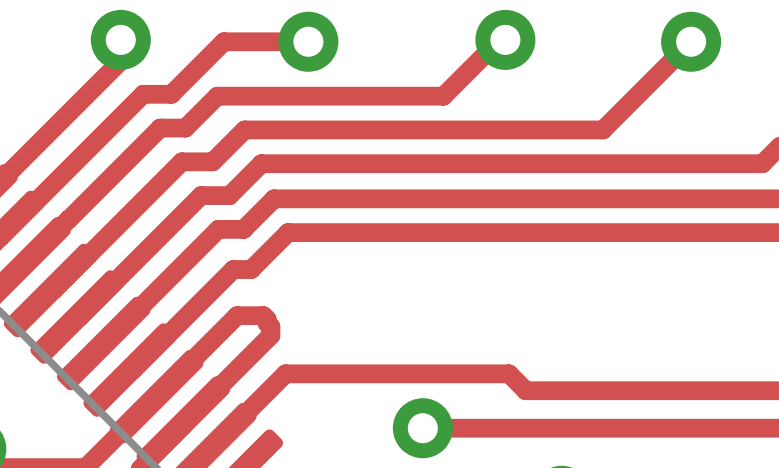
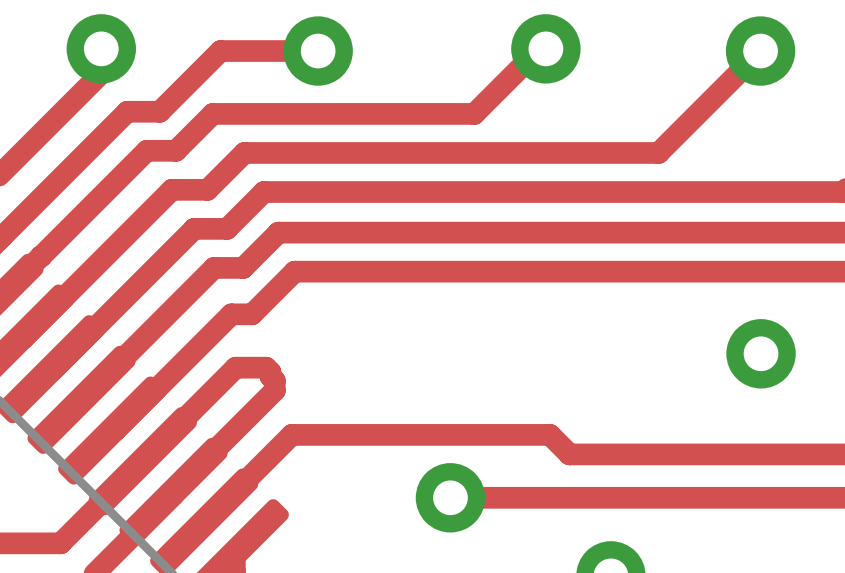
via: none -> (761, 353)

